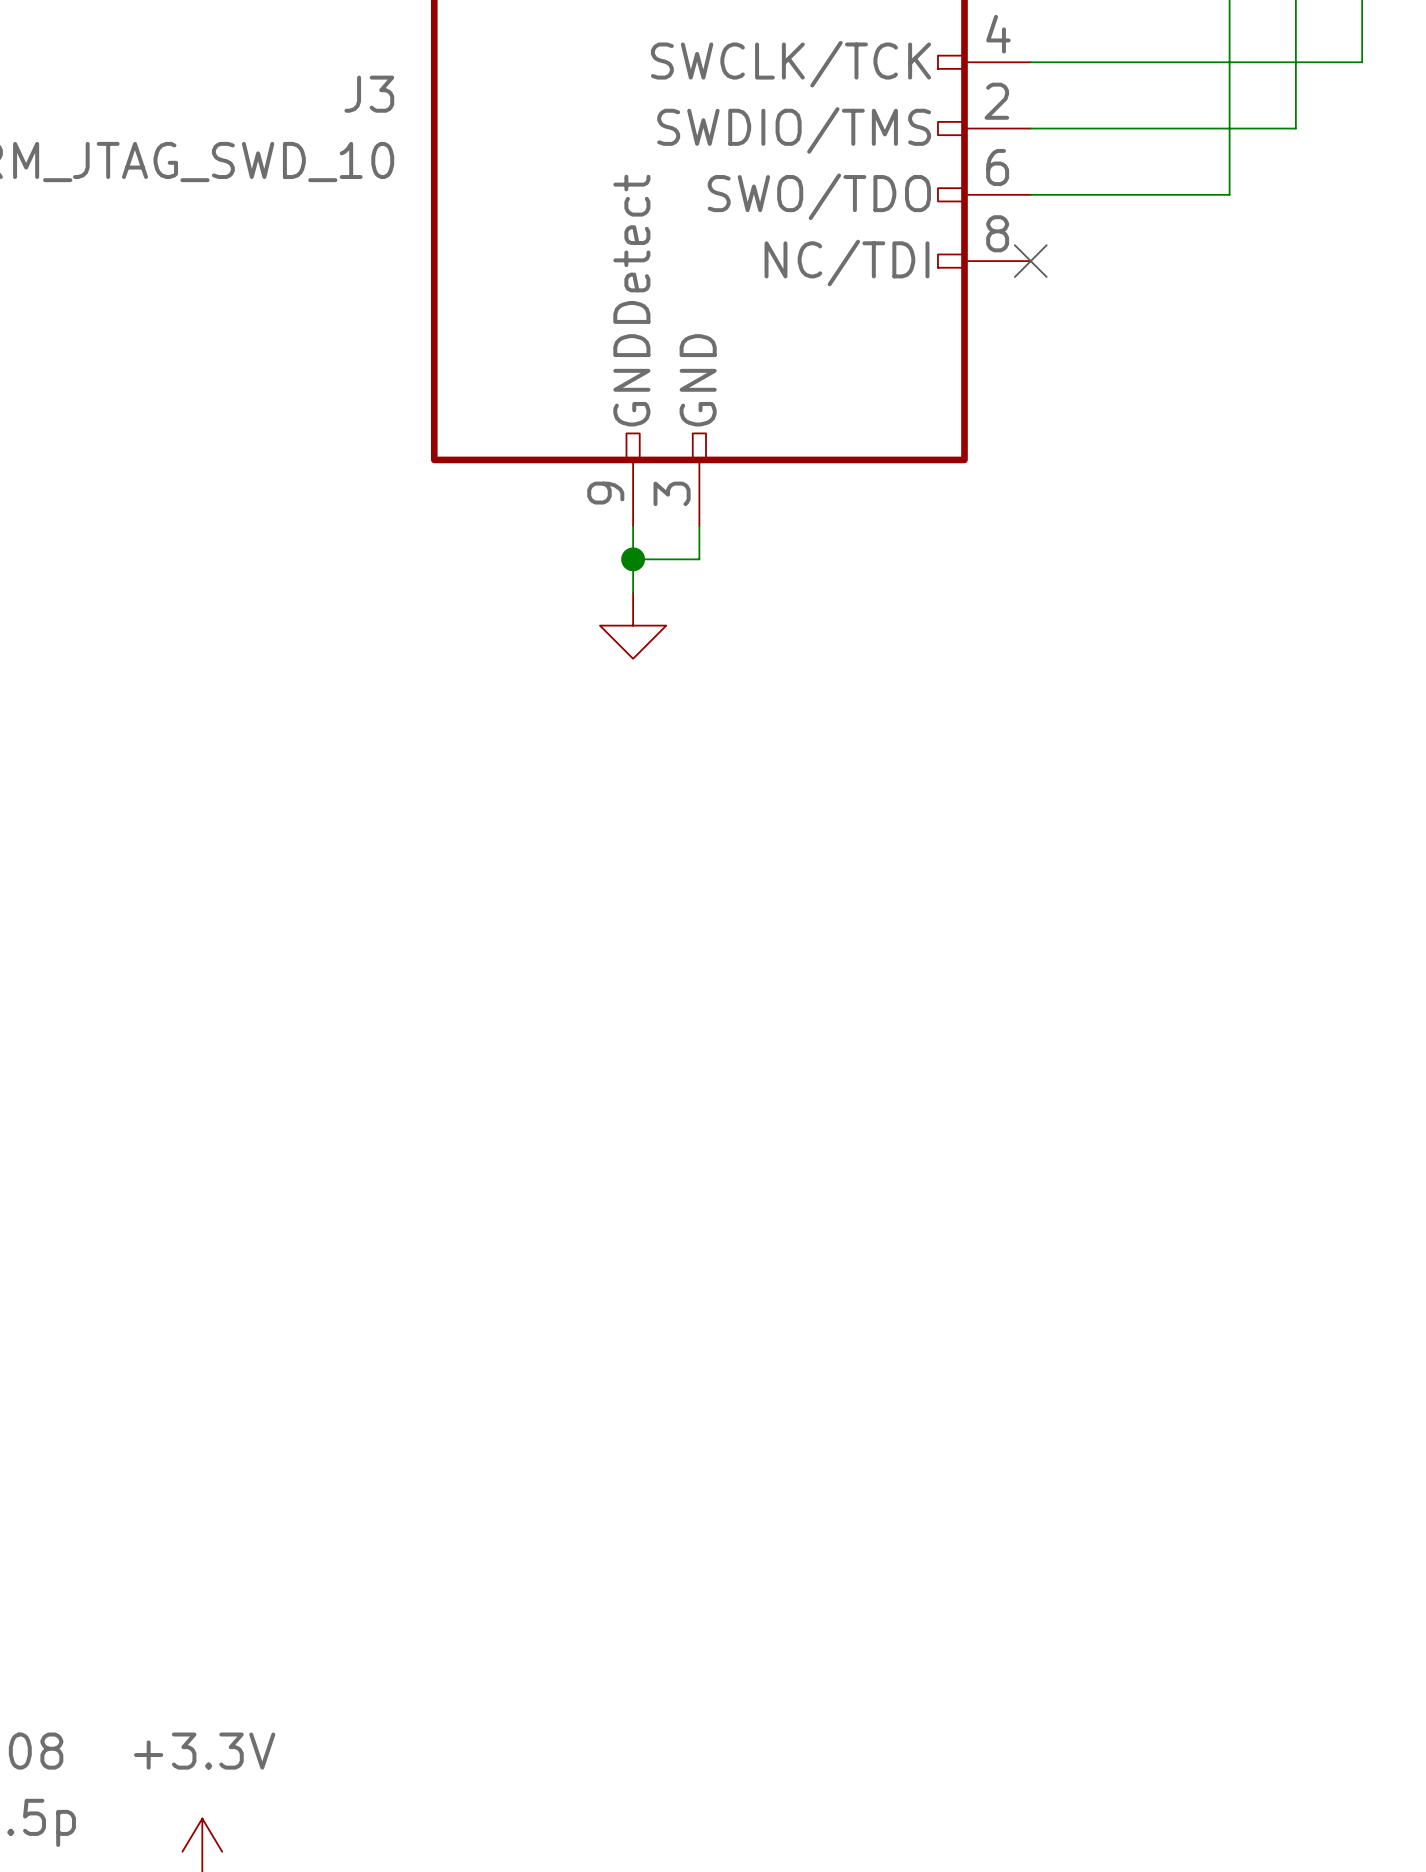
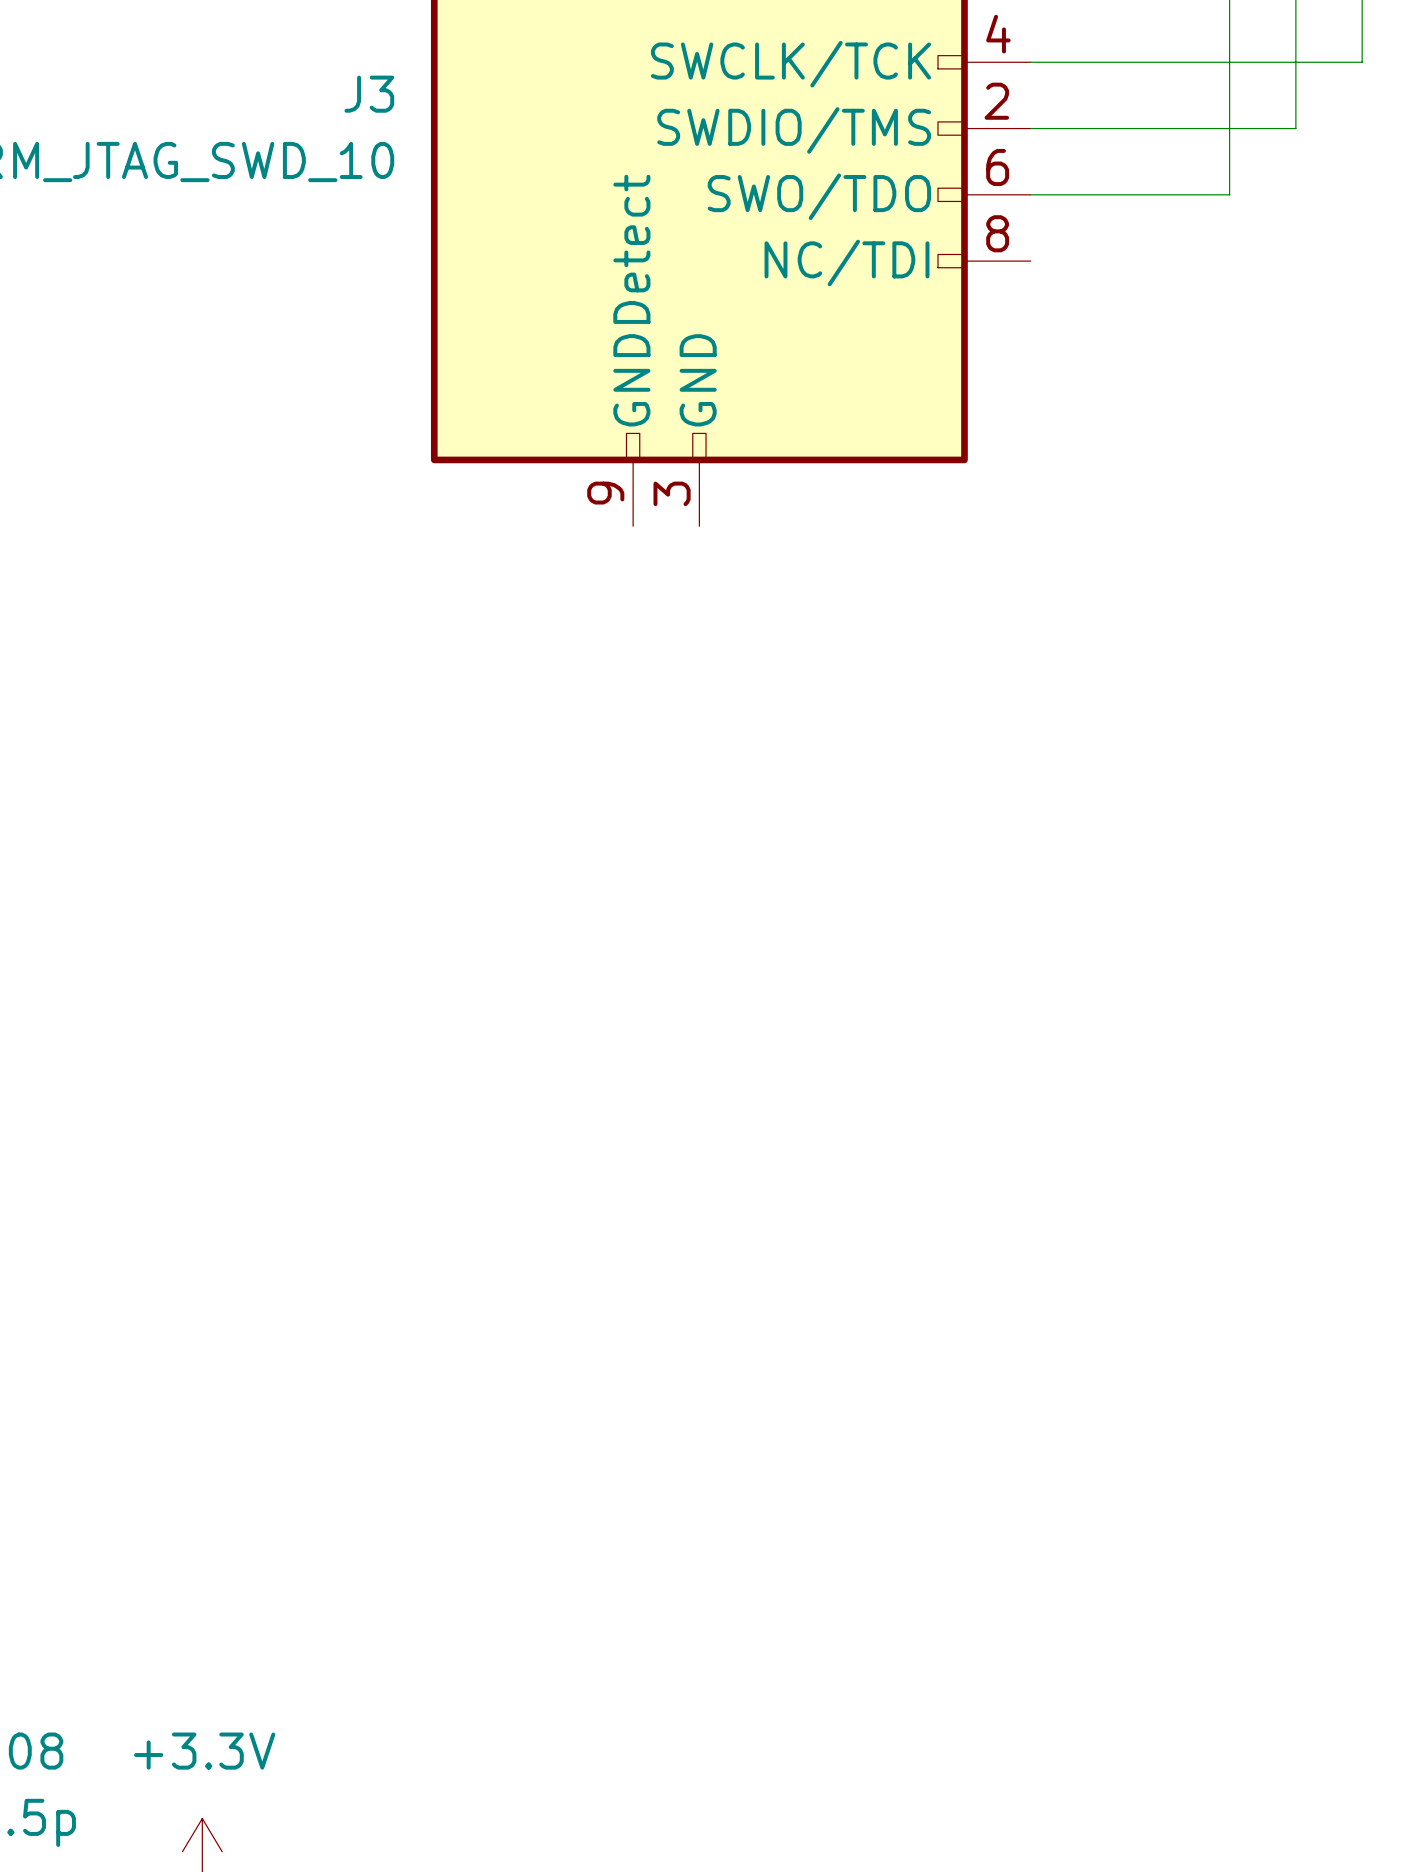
no-connect mark: (1030, 261) -> none
wire: (633, 526) (633, 592) -> none
wire: (699, 526) (699, 559) (633, 559) -> none
junction: (633, 559) -> none
power symbol: (633, 625) -> none

